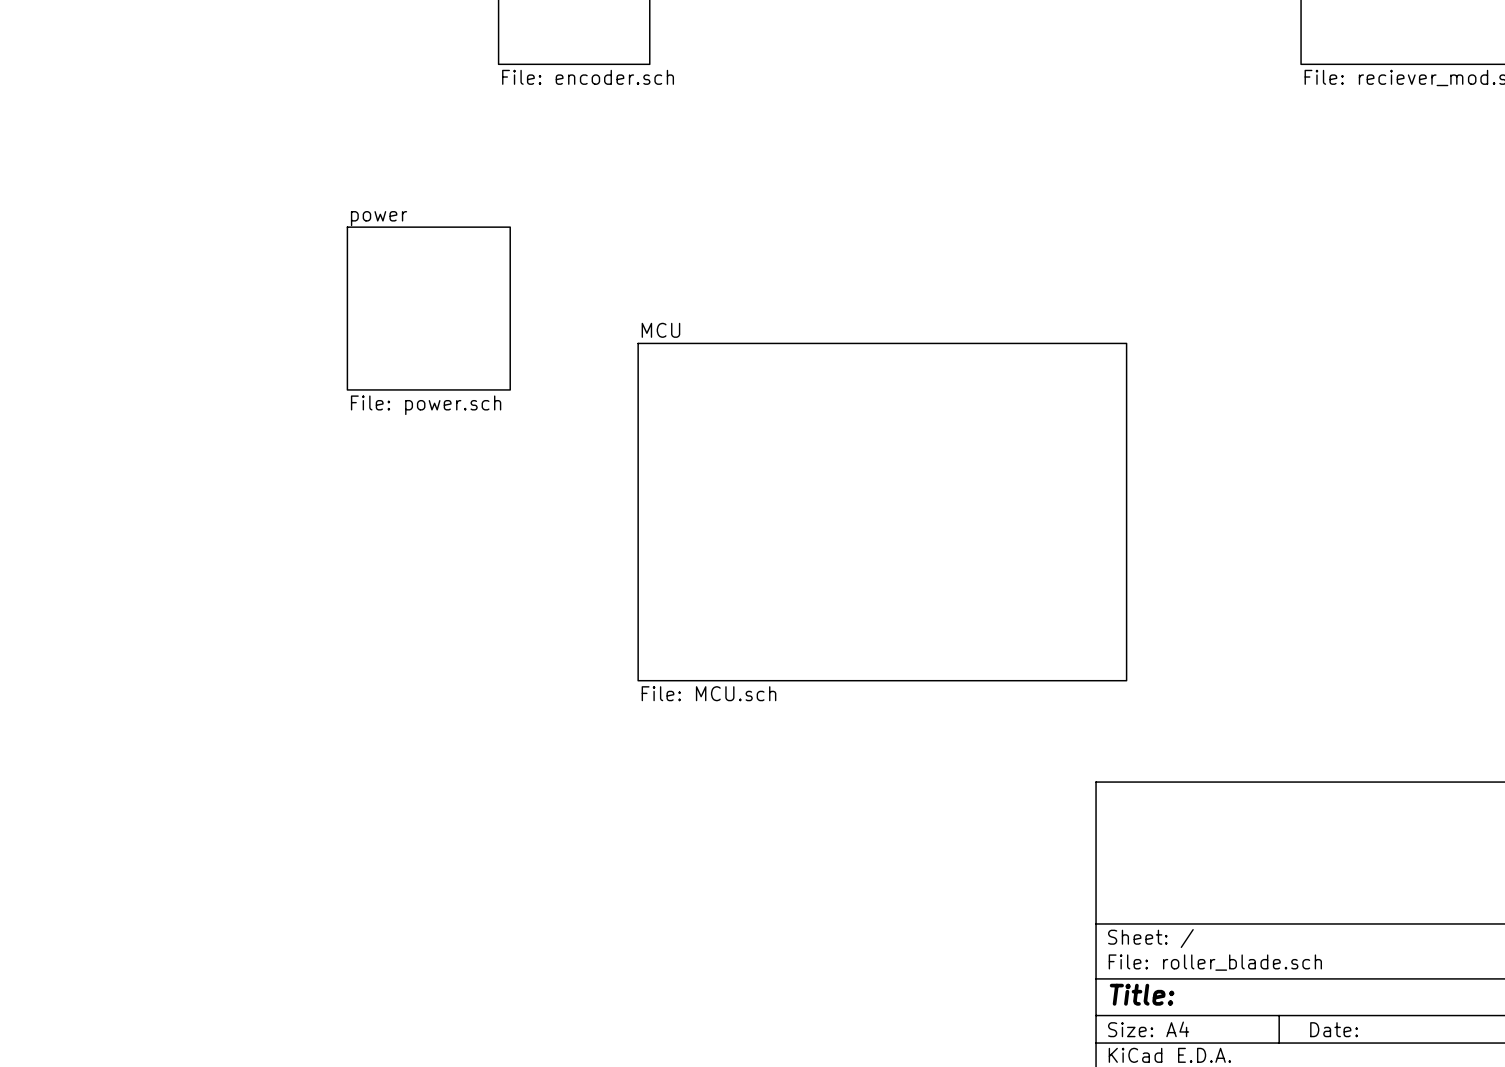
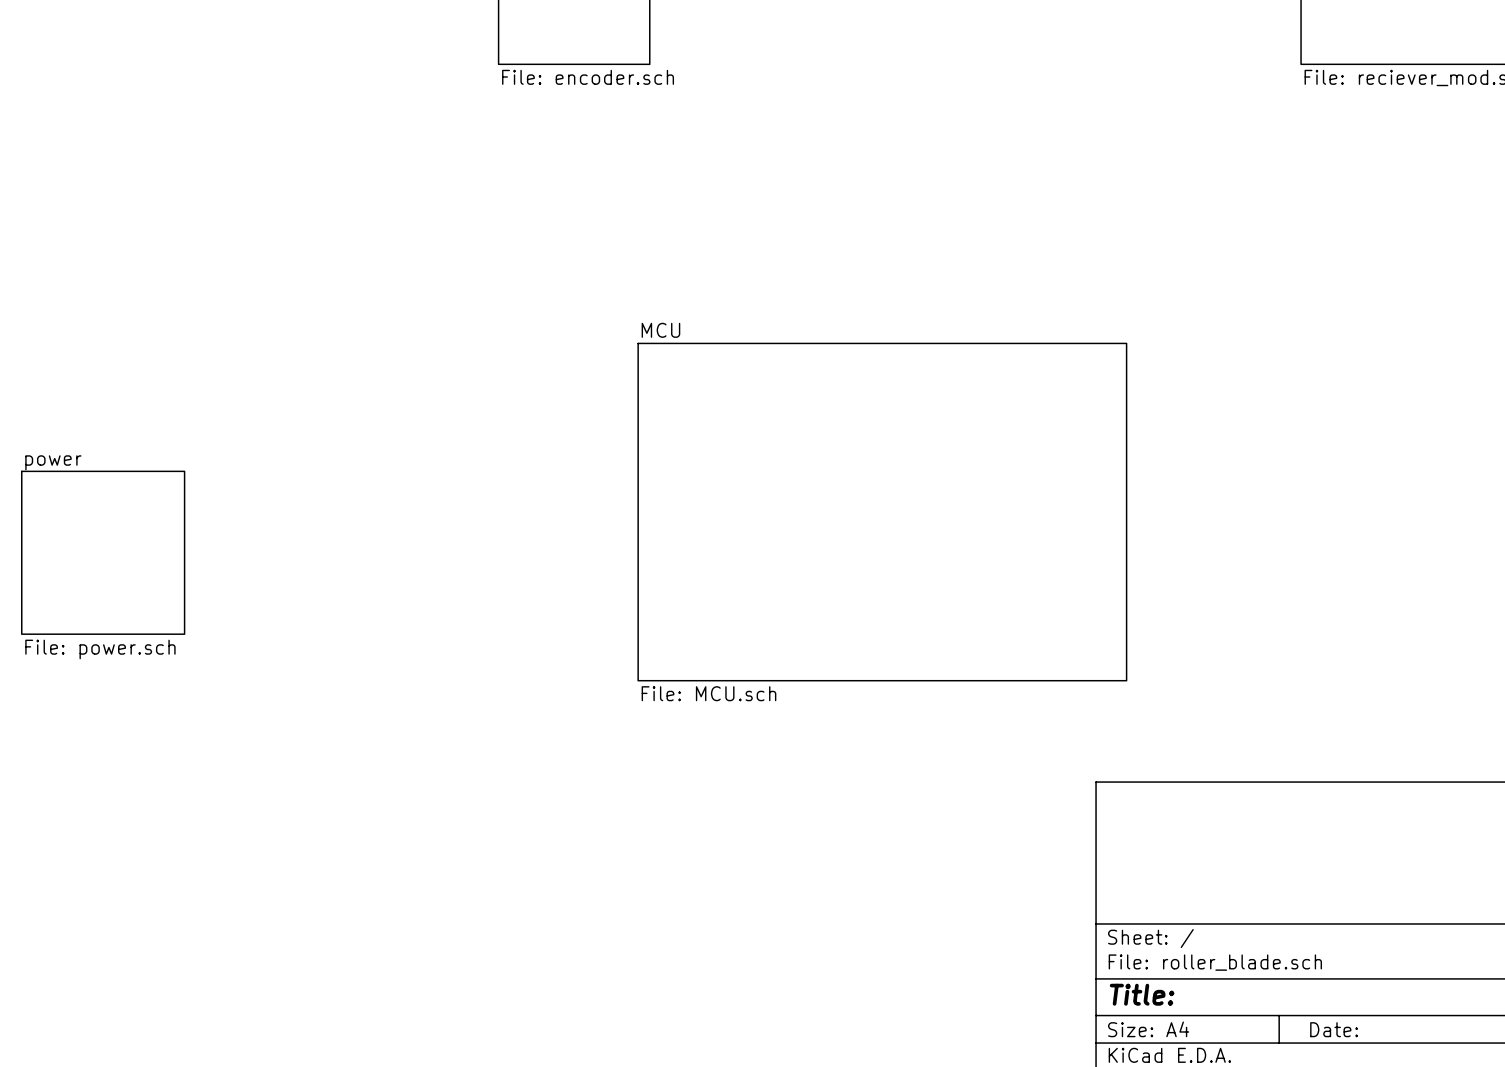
sheet power: File: power.sch (428, 308) -> none
sheet power: none -> File: power.sch (103, 552)

